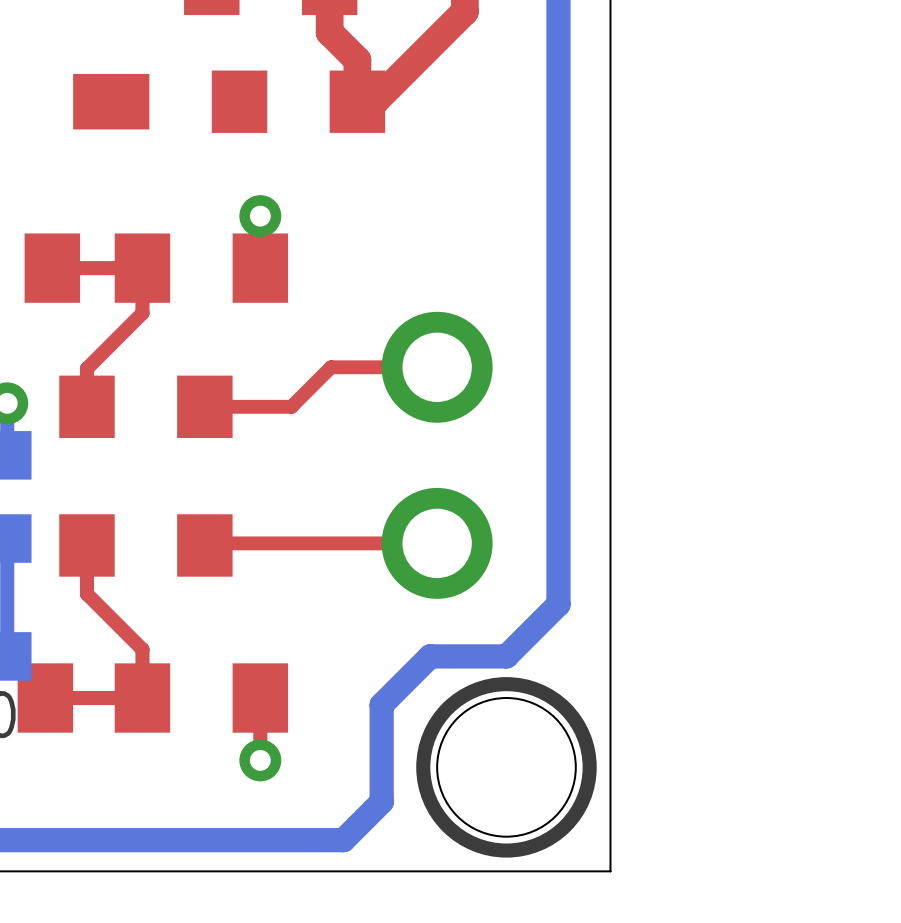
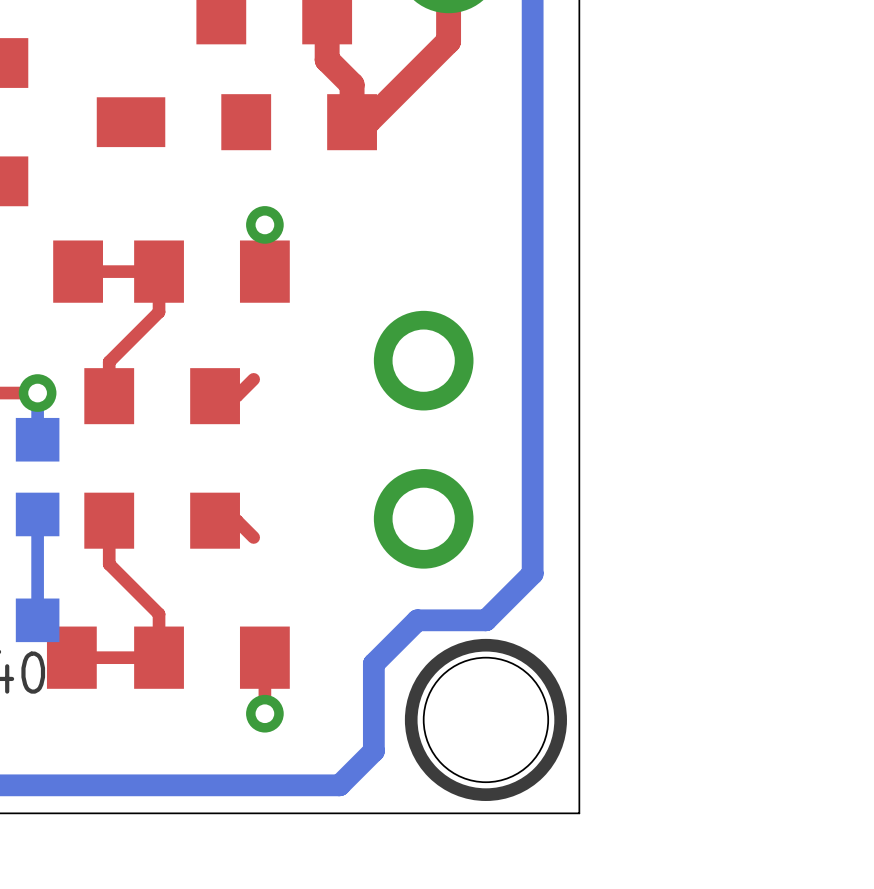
top track: (437, 367) (331, 367) (291, 406) (229, 406) -> (253, 379) (236, 396)
top track: (437, 543) (206, 543) (204, 545) -> (253, 537) (236, 520) (215, 520)

